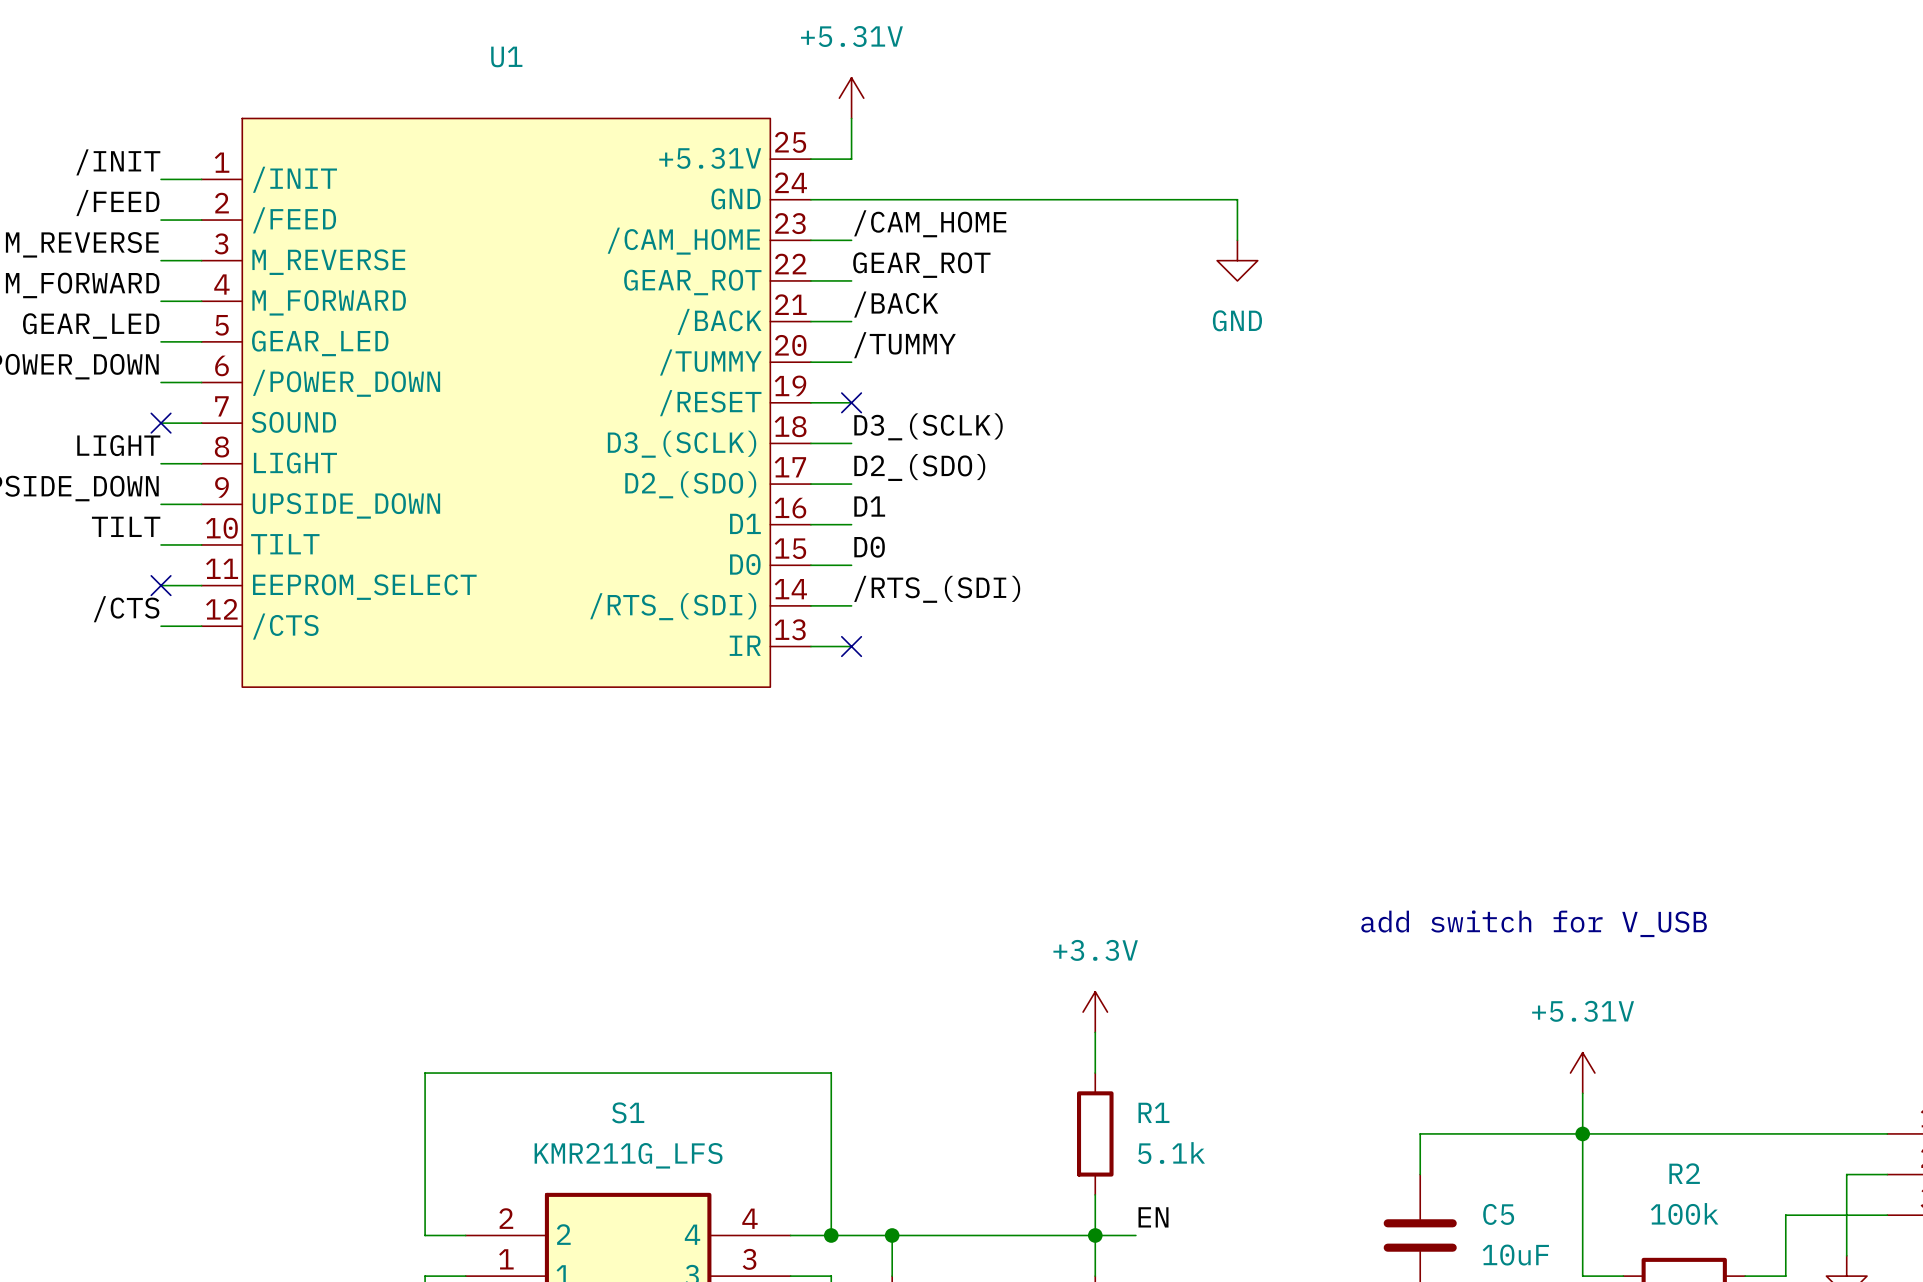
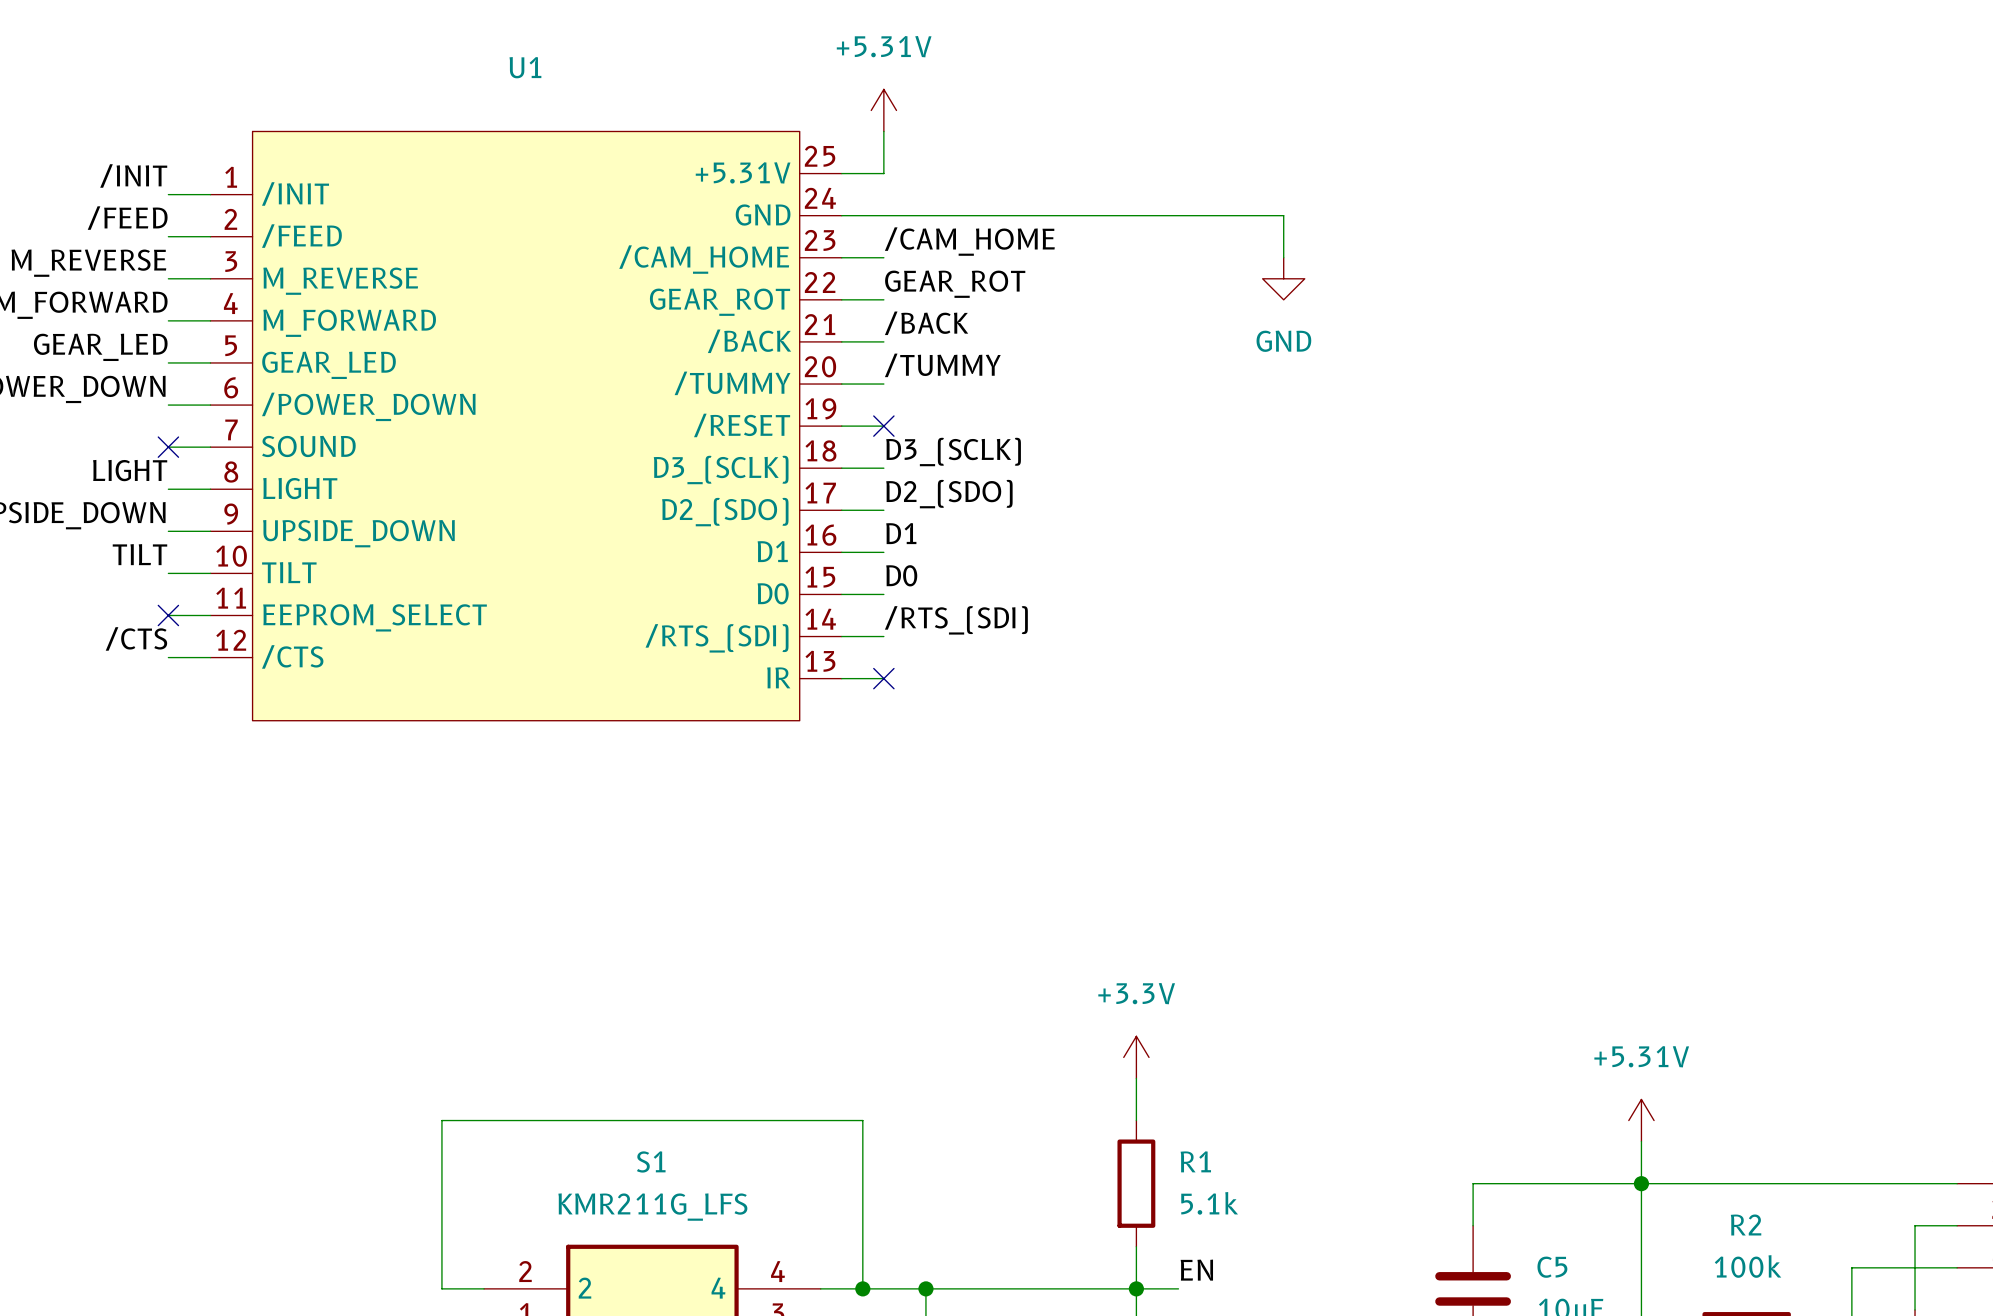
text: add switch for V_USB (1534, 923) -> none

